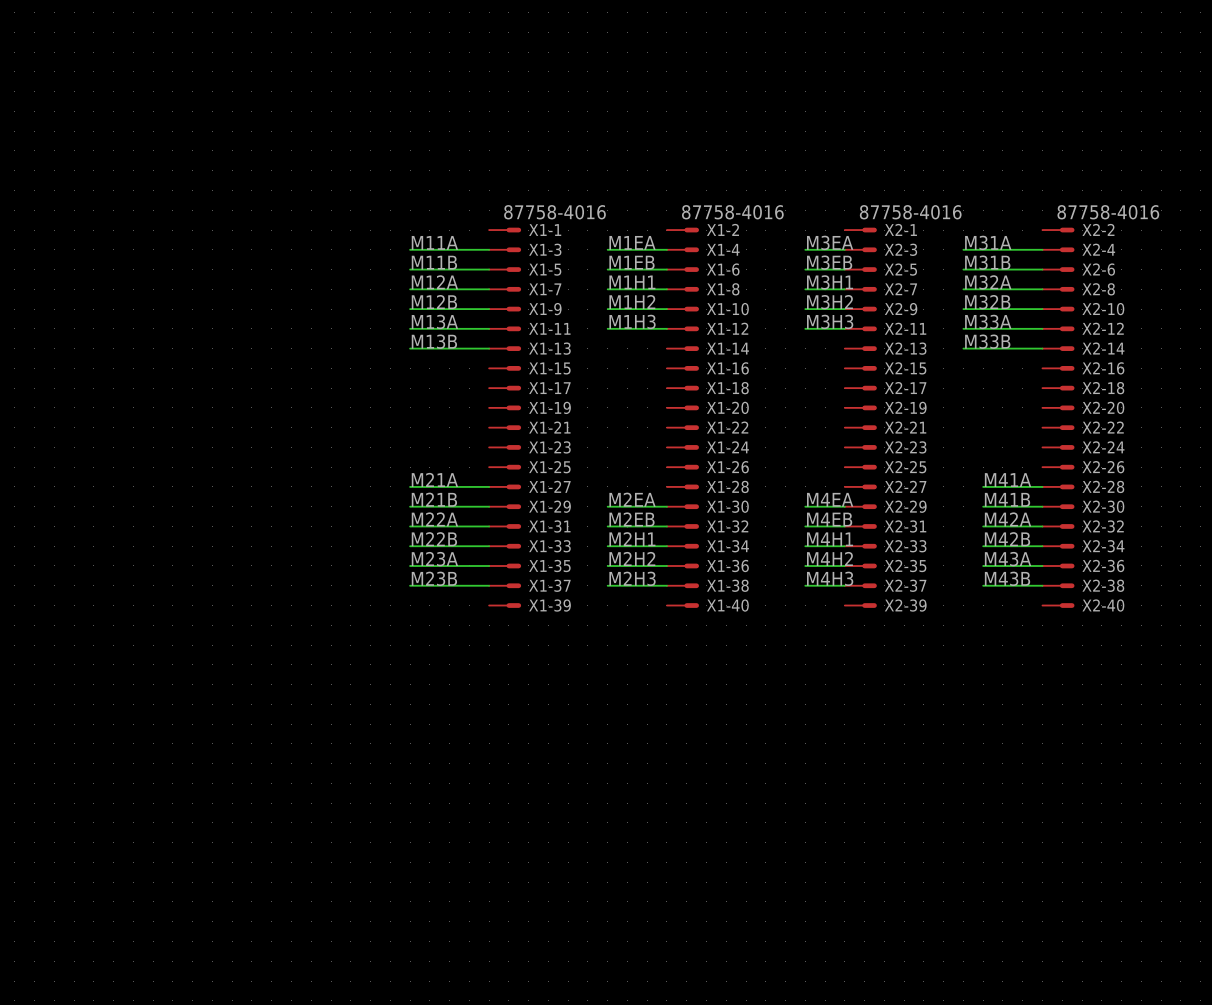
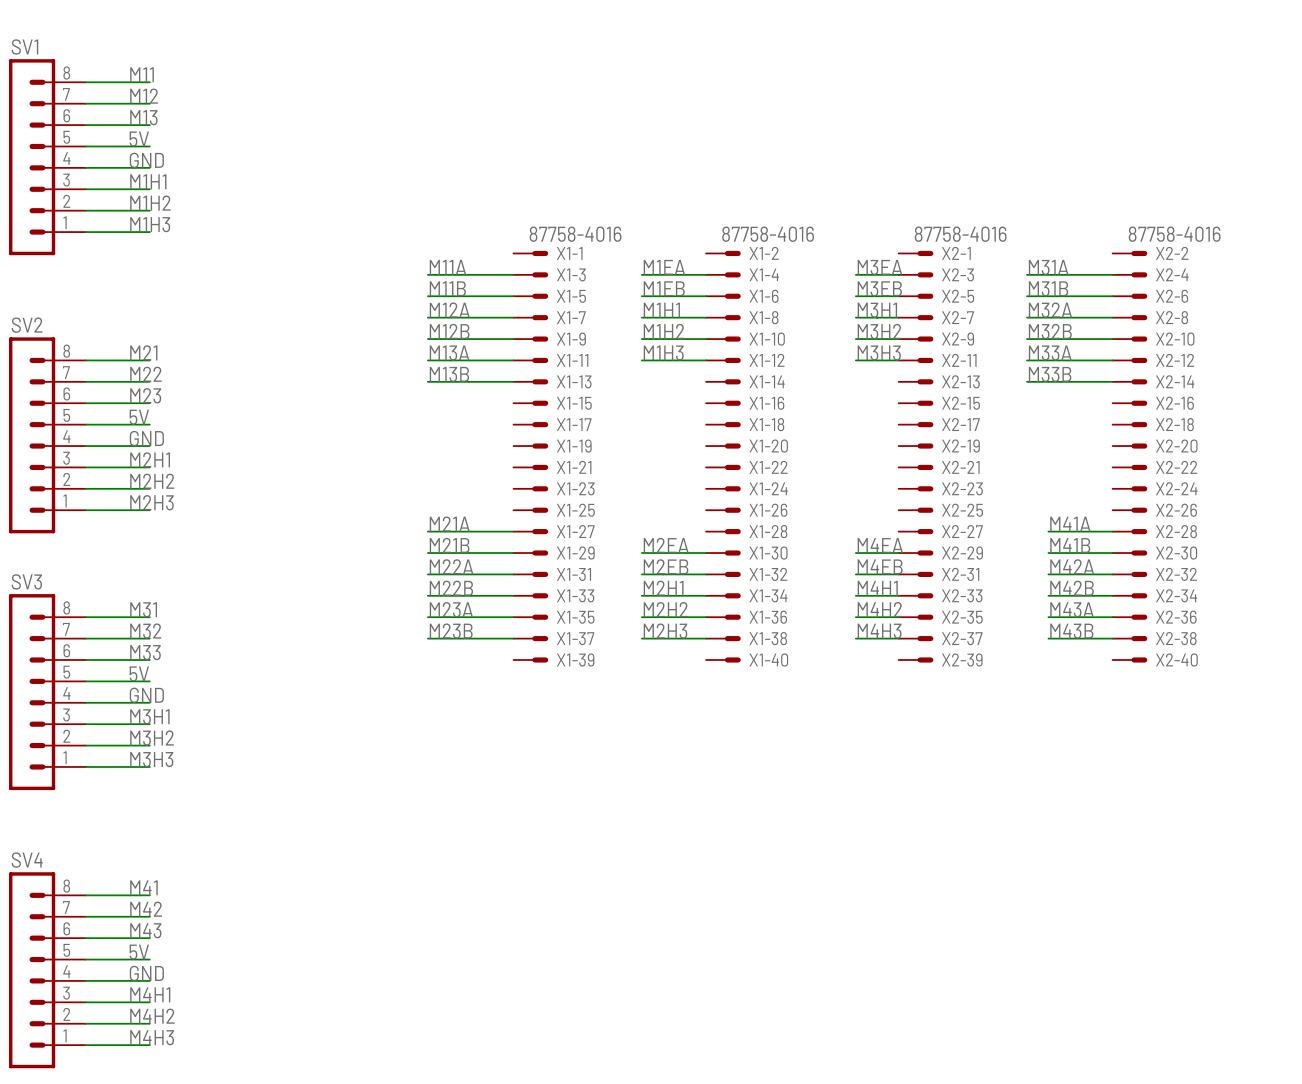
label: none -> M11 (142, 74)
wire: none -> (85, 82) (149, 82)
label: none -> M12 (144, 96)
wire: none -> (85, 103) (149, 103)
label: none -> M13 (143, 117)
wire: none -> (85, 125) (149, 125)
label: none -> 5V (139, 139)
wire: none -> (85, 146) (149, 146)
SV1: none -> (47, 157)
label: none -> GND (146, 160)
wire: none -> (85, 167) (149, 167)
label: none -> M1H1 (148, 181)
wire: none -> (85, 189) (149, 189)
label: none -> M1H2 (150, 203)
wire: none -> (85, 210) (149, 210)
label: none -> M1H3 (150, 224)
wire: none -> (85, 232) (149, 232)
label: none -> M21 (143, 352)
wire: none -> (85, 360) (149, 360)
label: none -> M22 (145, 374)
wire: none -> (85, 381) (149, 381)
label: none -> M23 (145, 395)
wire: none -> (85, 403) (149, 403)
label: none -> 5V (139, 417)
wire: none -> (85, 424) (149, 424)
SV2: none -> (47, 435)
label: none -> GND (146, 438)
wire: none -> (85, 446) (149, 446)
label: none -> M2H1 (150, 459)
wire: none -> (85, 467) (149, 467)
label: none -> M2H2 (152, 481)
wire: none -> (85, 488) (149, 488)
label: none -> M2H3 (151, 502)
wire: none -> (85, 510) (149, 510)
label: none -> M31 (143, 609)
wire: none -> (85, 617) (149, 617)
label: none -> M32 (145, 631)
wire: none -> (85, 638) (149, 638)
label: none -> M33 (145, 652)
wire: none -> (85, 660) (149, 660)
label: none -> 5V (139, 673)
wire: none -> (85, 681) (149, 681)
SV3: none -> (47, 692)
label: none -> GND (146, 695)
wire: none -> (85, 702) (149, 702)
label: none -> M3H1 (149, 716)
wire: none -> (85, 724) (149, 724)
label: none -> M3H2 (152, 738)
wire: none -> (85, 745) (149, 745)
label: none -> M3H3 (151, 759)
wire: none -> (85, 766) (149, 766)
label: none -> M41 (143, 887)
wire: none -> (85, 895) (149, 895)
label: none -> M42 (146, 909)
wire: none -> (85, 916) (149, 916)
label: none -> M43 (145, 930)
wire: none -> (85, 938) (149, 938)
label: none -> 5V (139, 952)
wire: none -> (85, 959) (149, 959)
SV4: none -> (47, 970)
label: none -> GND (146, 973)
wire: none -> (85, 980) (149, 980)
label: none -> M4H1 (150, 994)
wire: none -> (85, 1002) (149, 1002)
label: none -> M4H2 (152, 1016)
wire: none -> (85, 1023) (149, 1023)
label: none -> M4H3 (152, 1037)
wire: none -> (85, 1045) (149, 1045)

